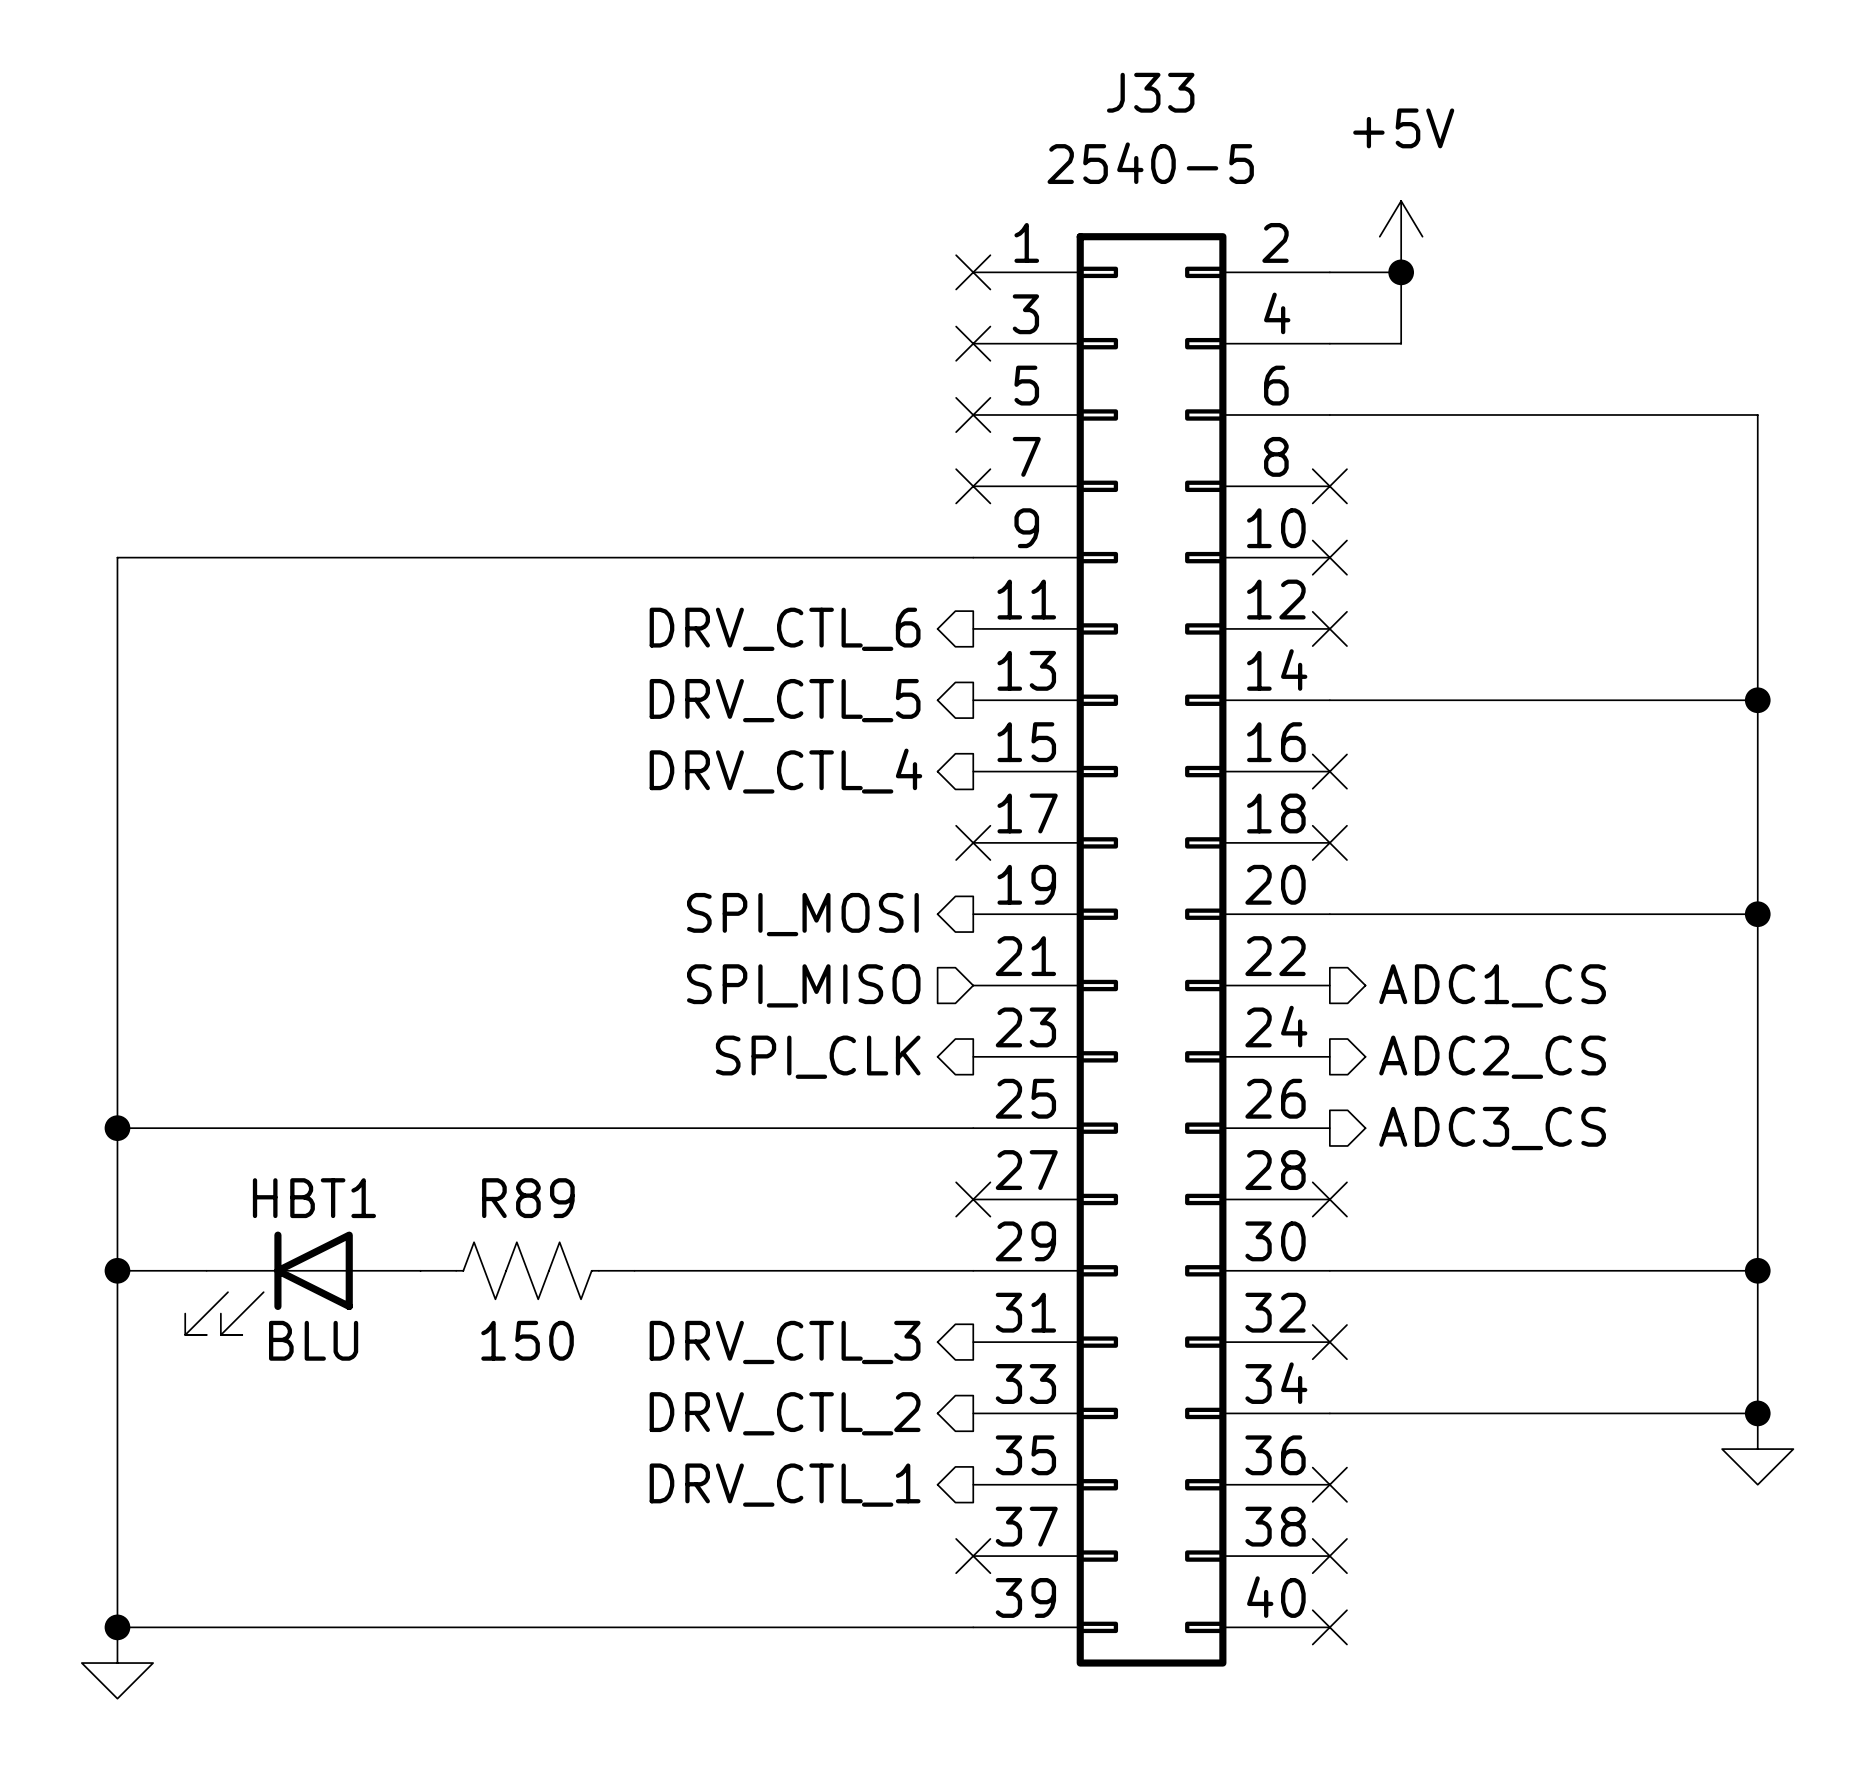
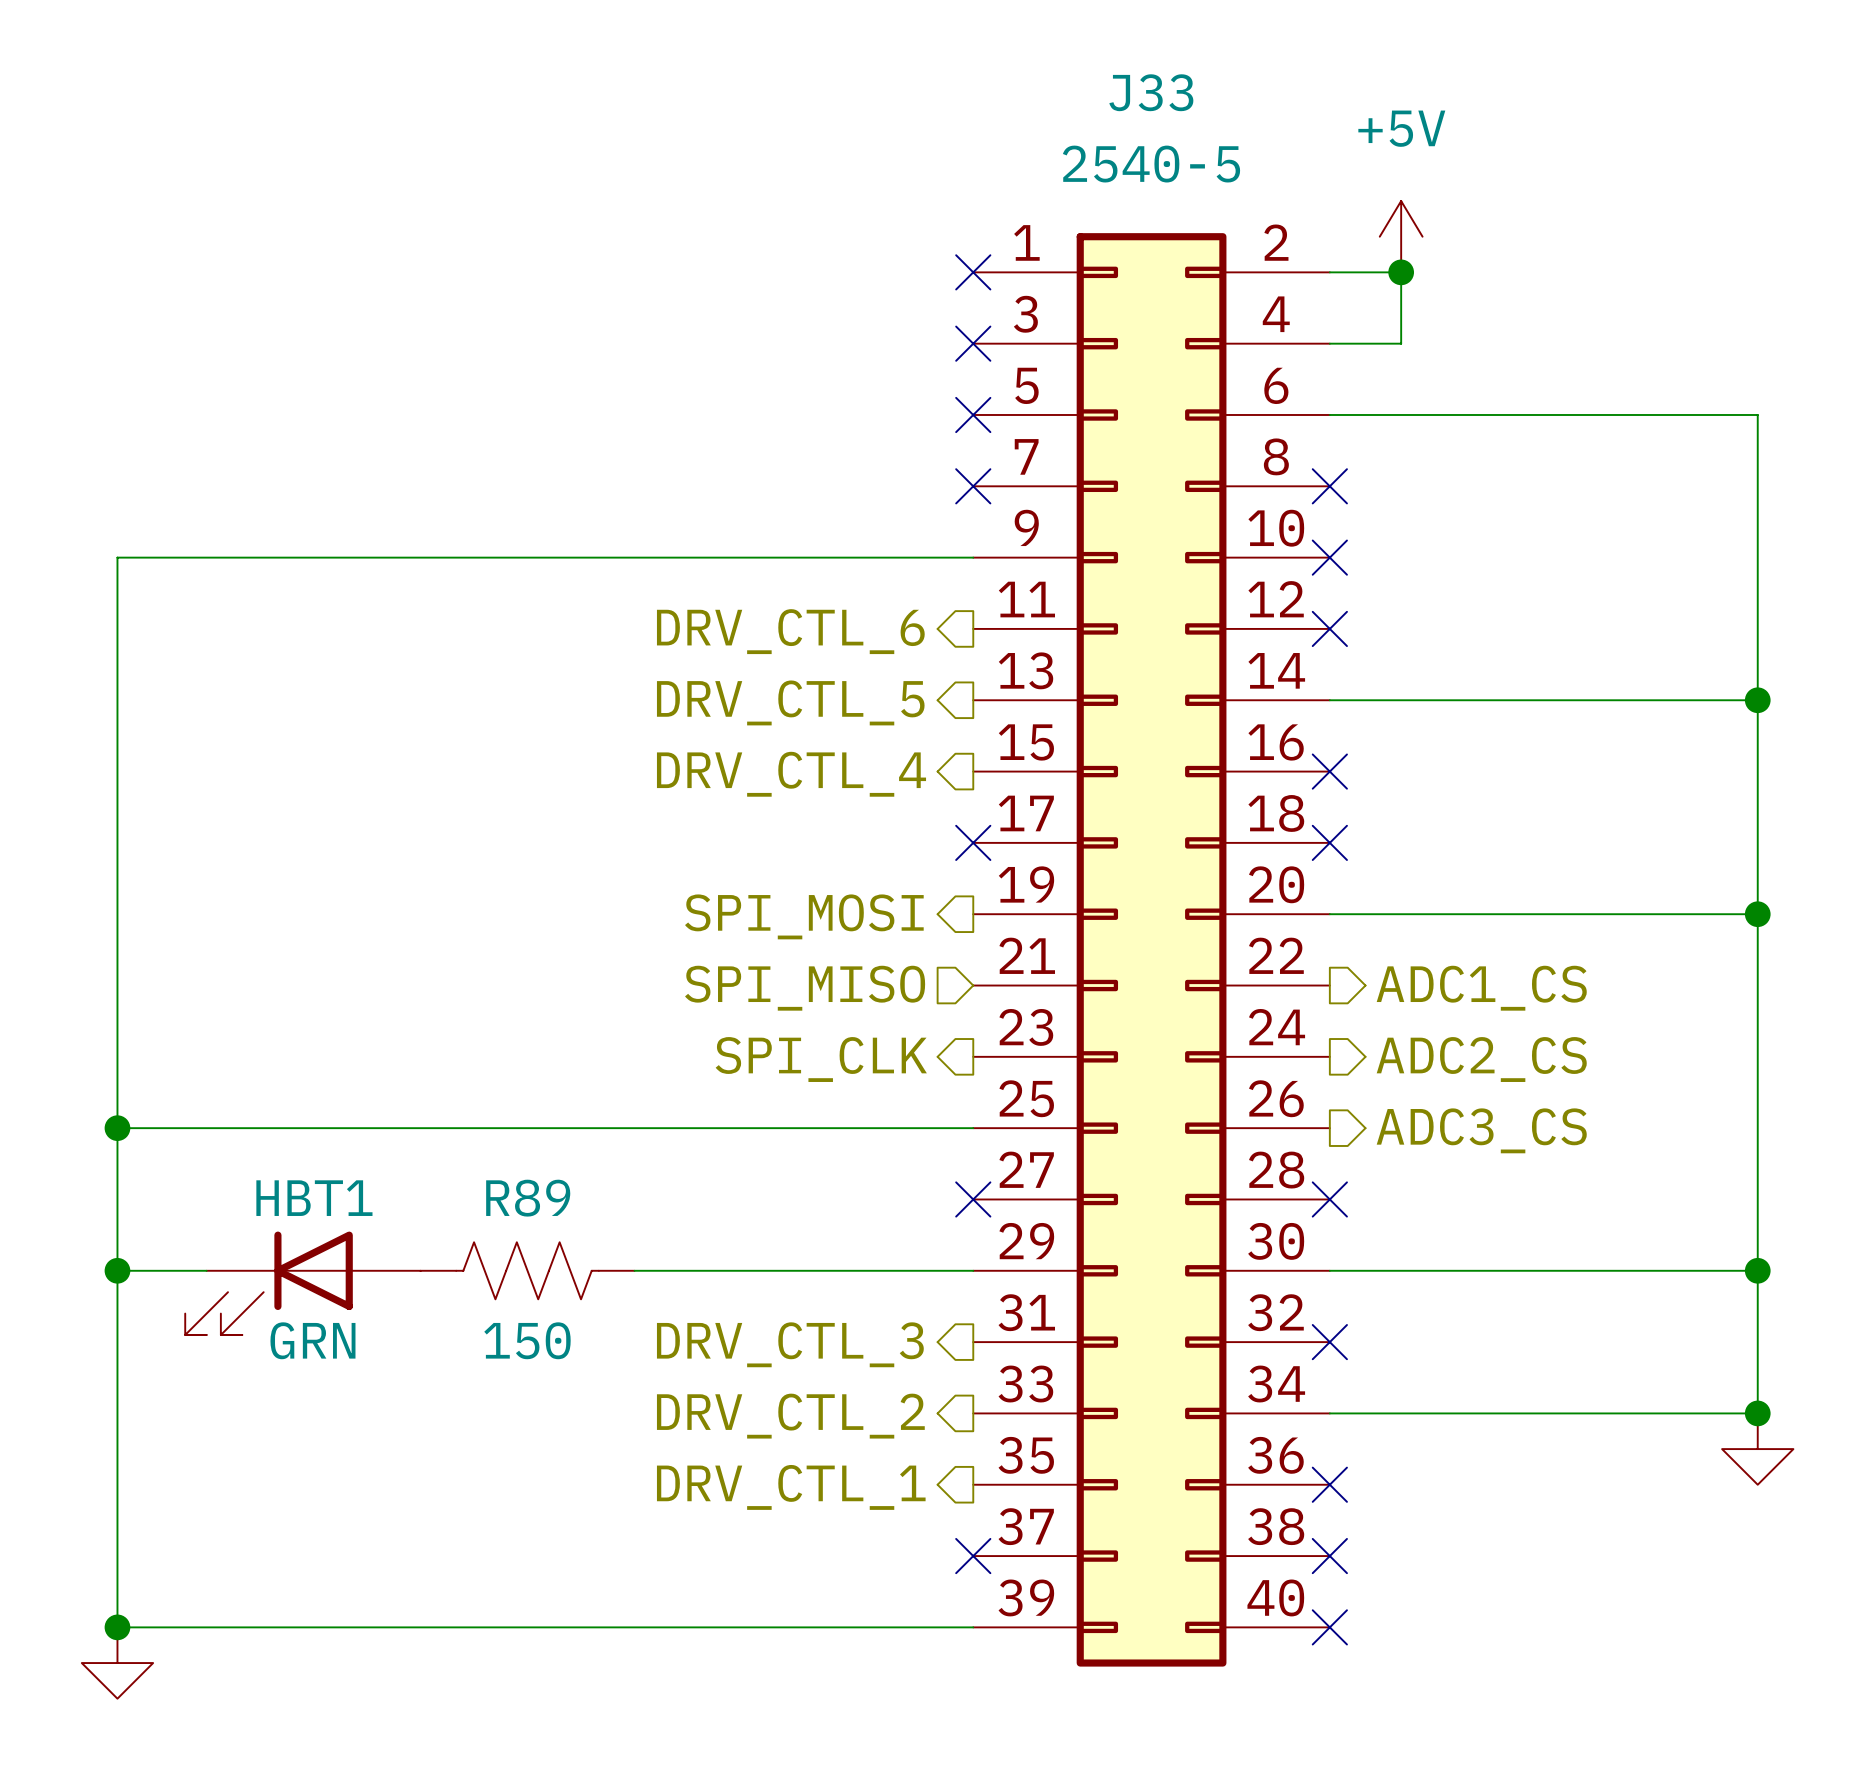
HBT1 value: BLU (313, 1340) -> GRN (312, 1340)

